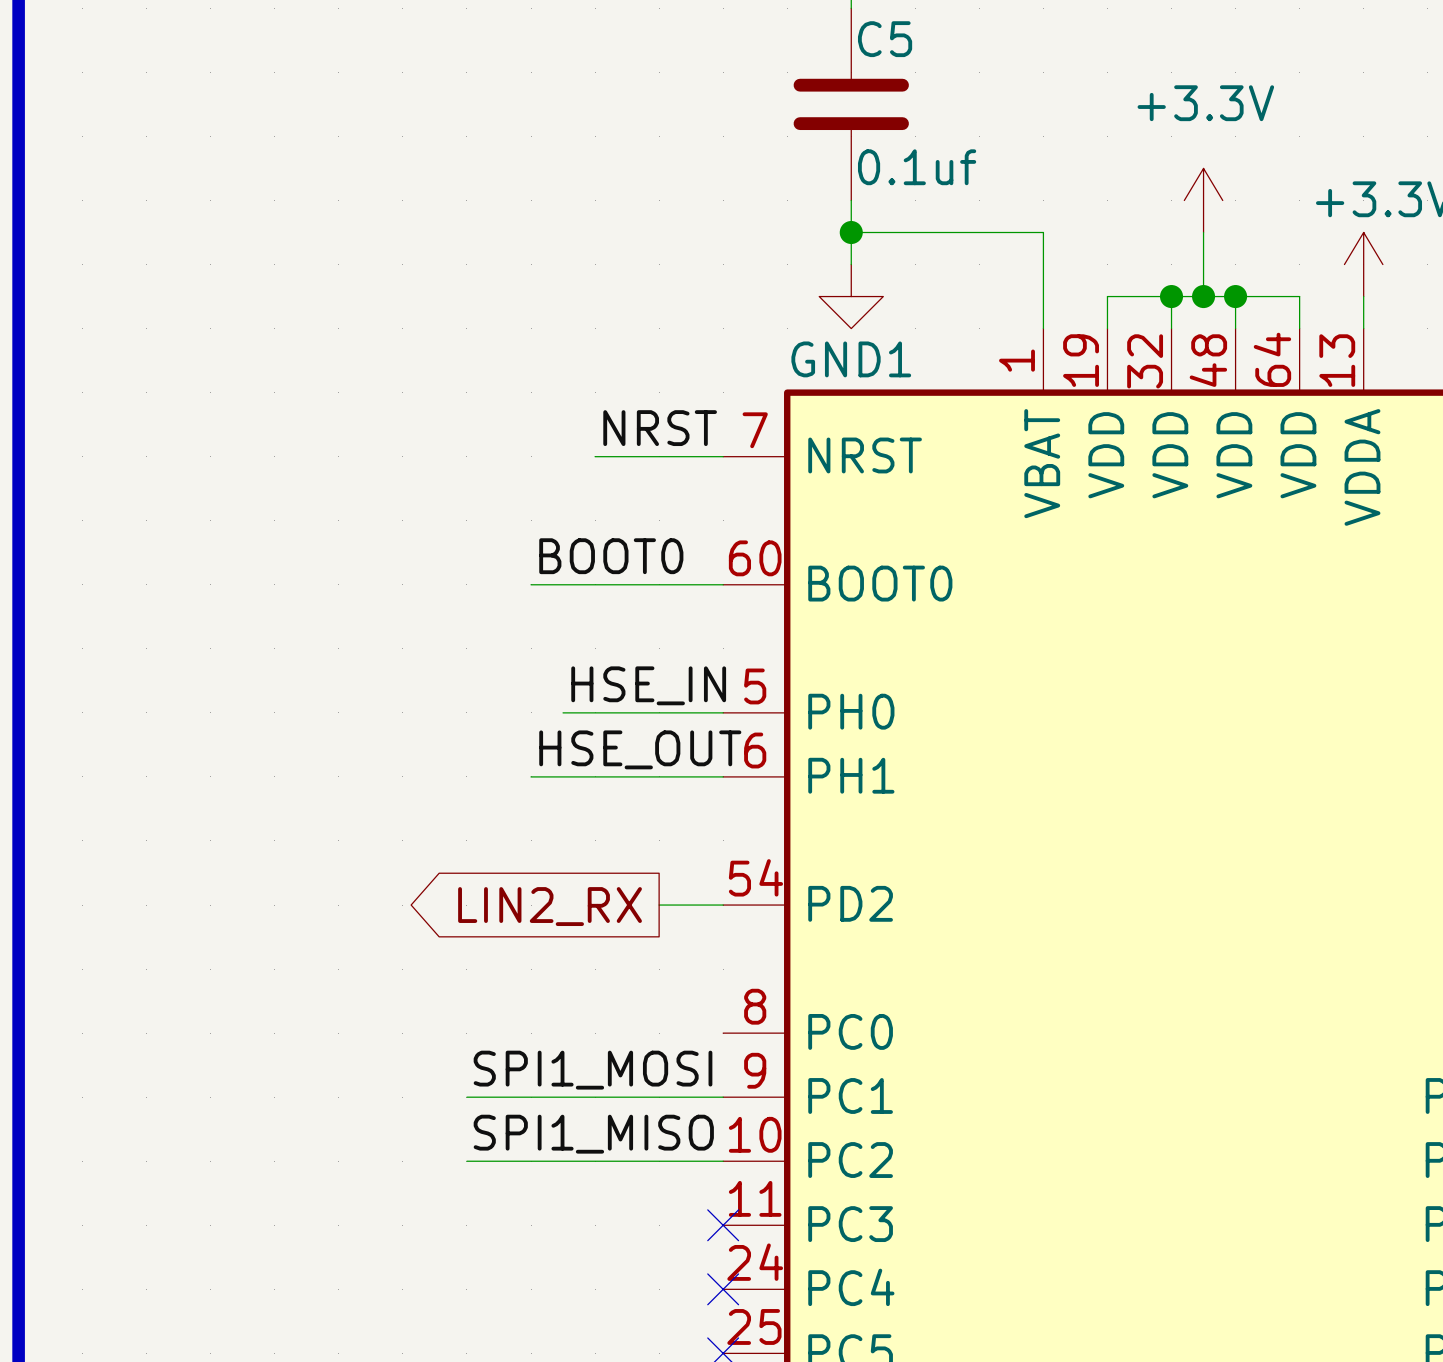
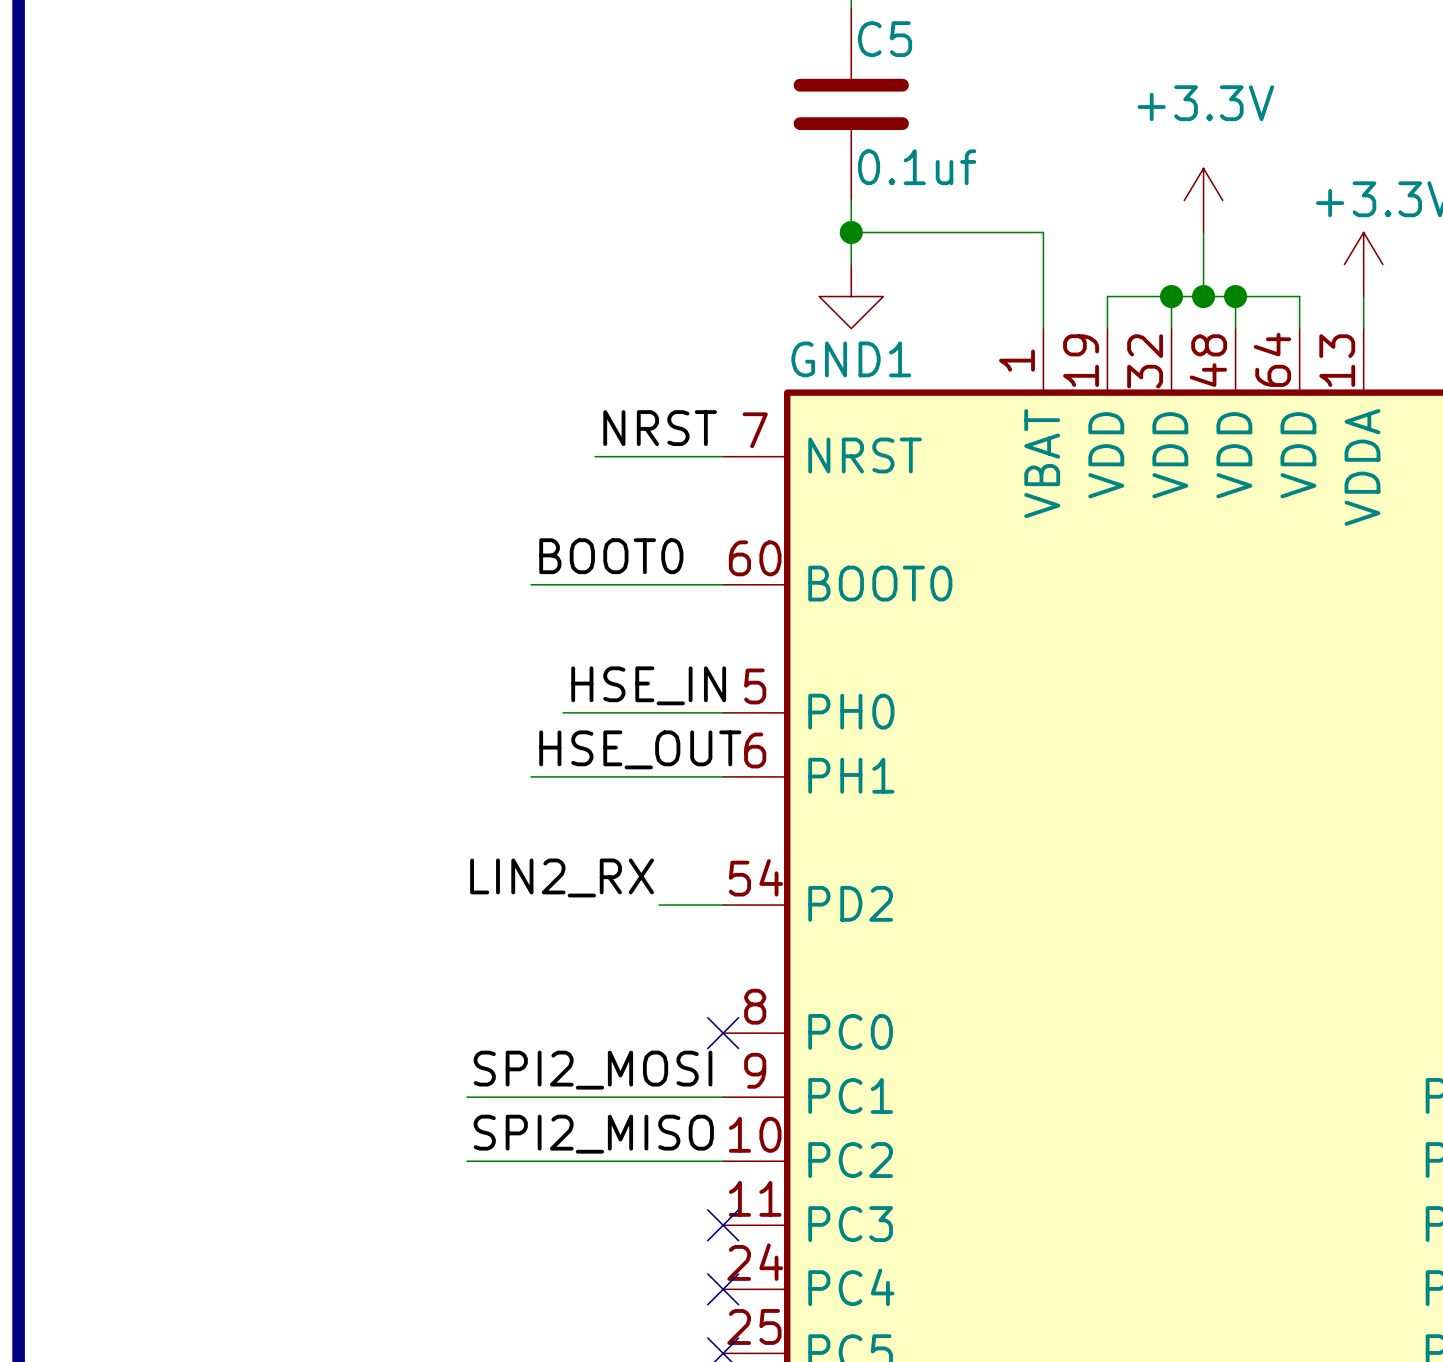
label: none -> LIN2_RX (562, 877)
global label: LIN2_RX (550, 906) -> none
no-connect mark: none -> (723, 1033)
label: SPI1_MOSI (593, 1070) -> SPI2_MOSI (593, 1070)
label: SPI1_MISO (593, 1134) -> SPI2_MISO (593, 1134)

